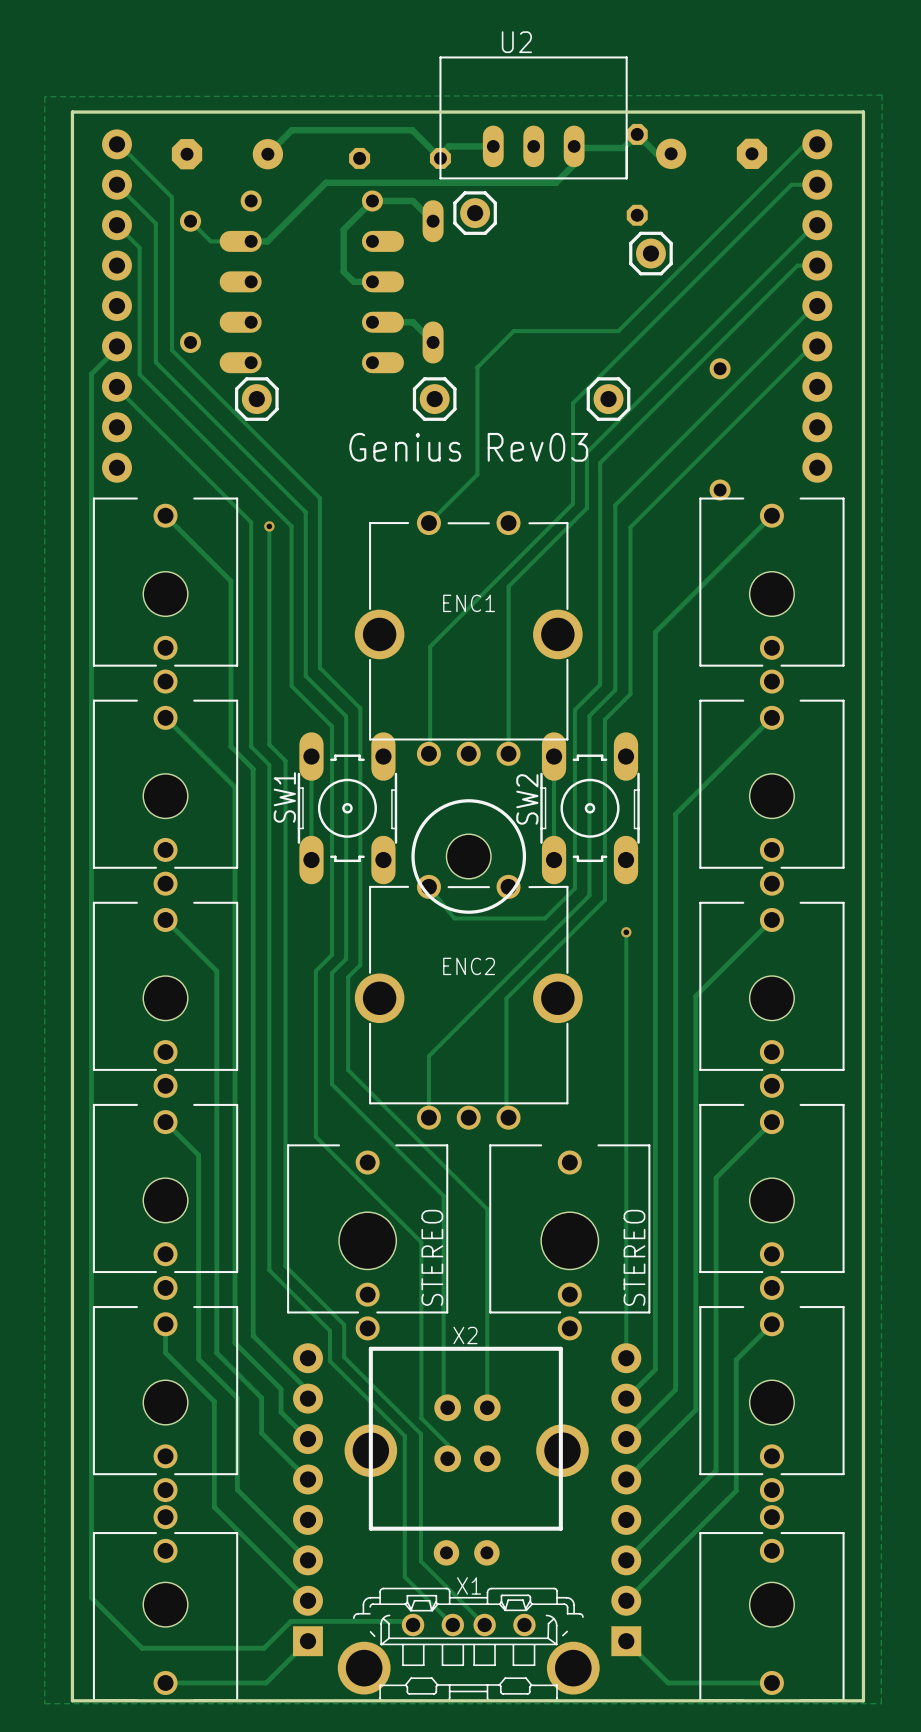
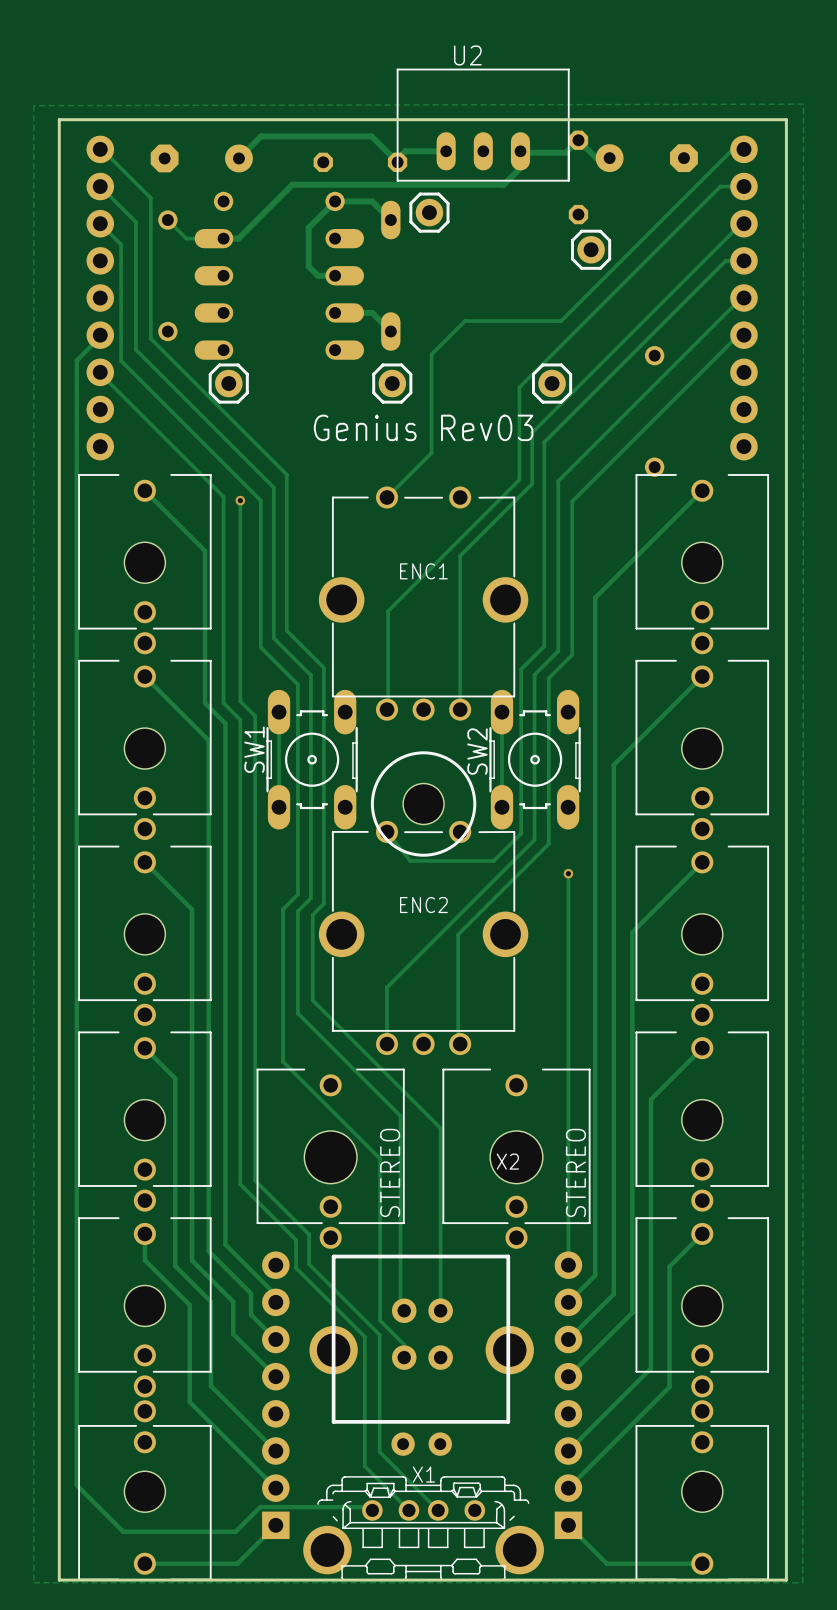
X2 name position: X2 (465, 1335) -> X2 (507, 1161)

